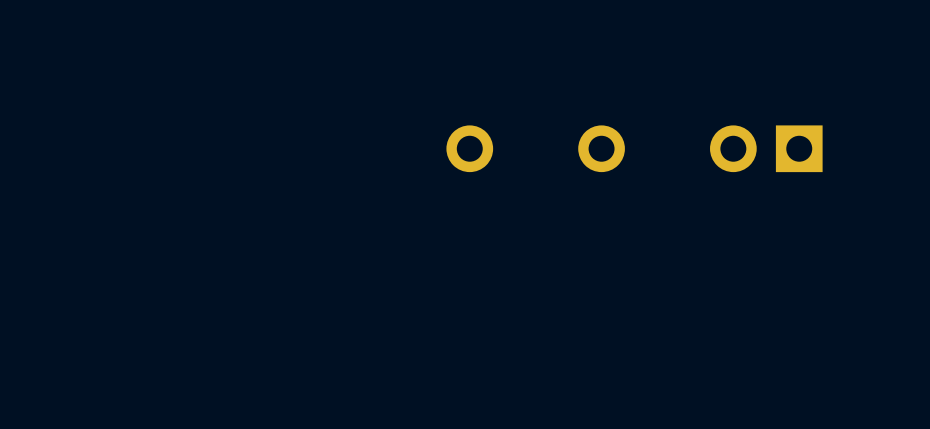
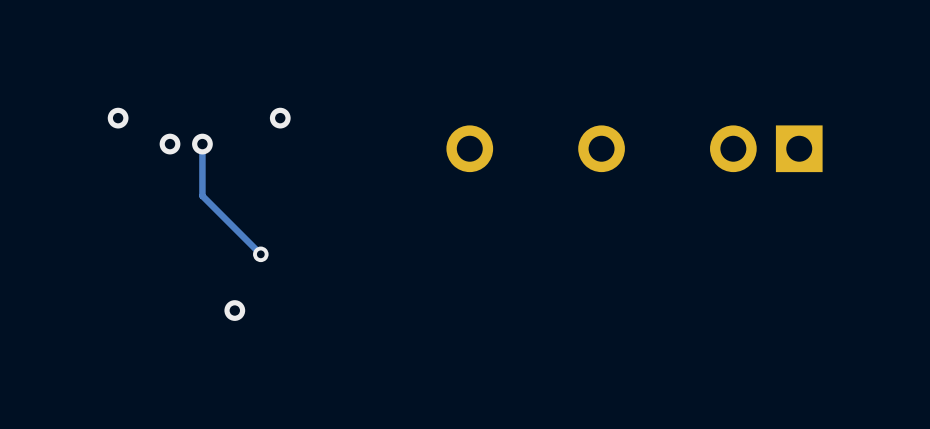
via: none -> (118, 118)
via: none -> (280, 118)
via: none -> (170, 144)
track: none -> (202, 144) (202, 195) (260, 254)
via: none -> (202, 144)
via: none -> (260, 254)
via: none -> (234, 310)

